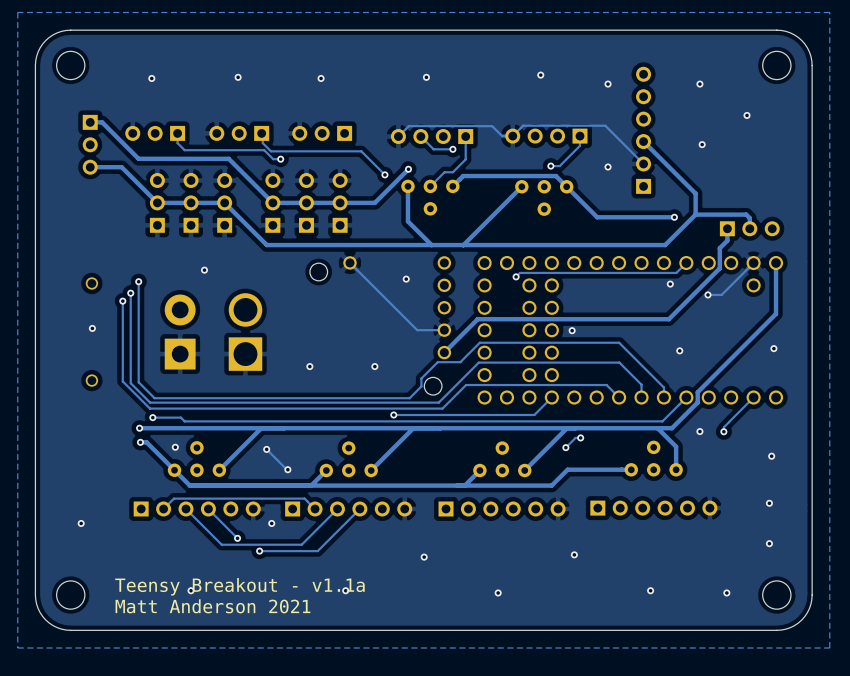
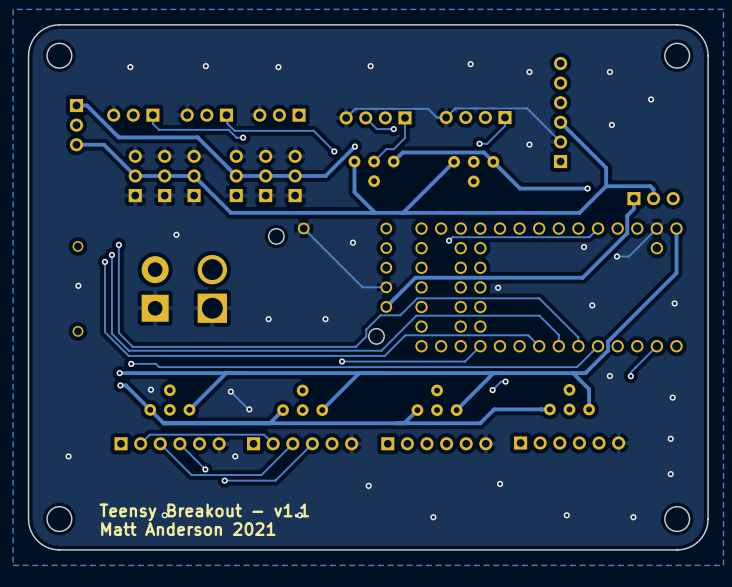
text: Teensy Breakout - v1.1a (239, 586) -> Teensy Breakout - v1.1 (204, 512)

